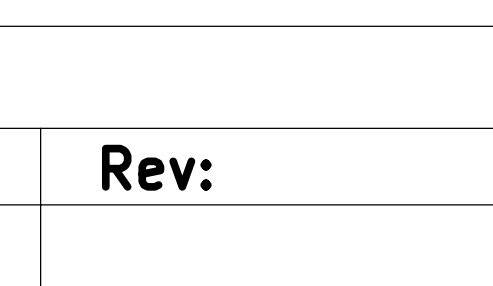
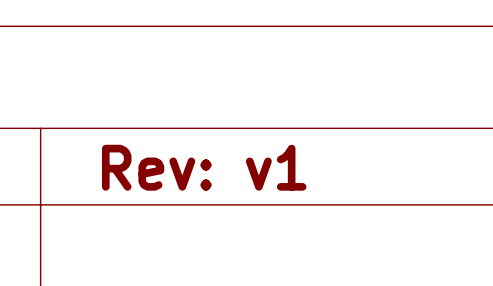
title block: Rev: (156, 167) -> Rev: v1 (204, 167)

